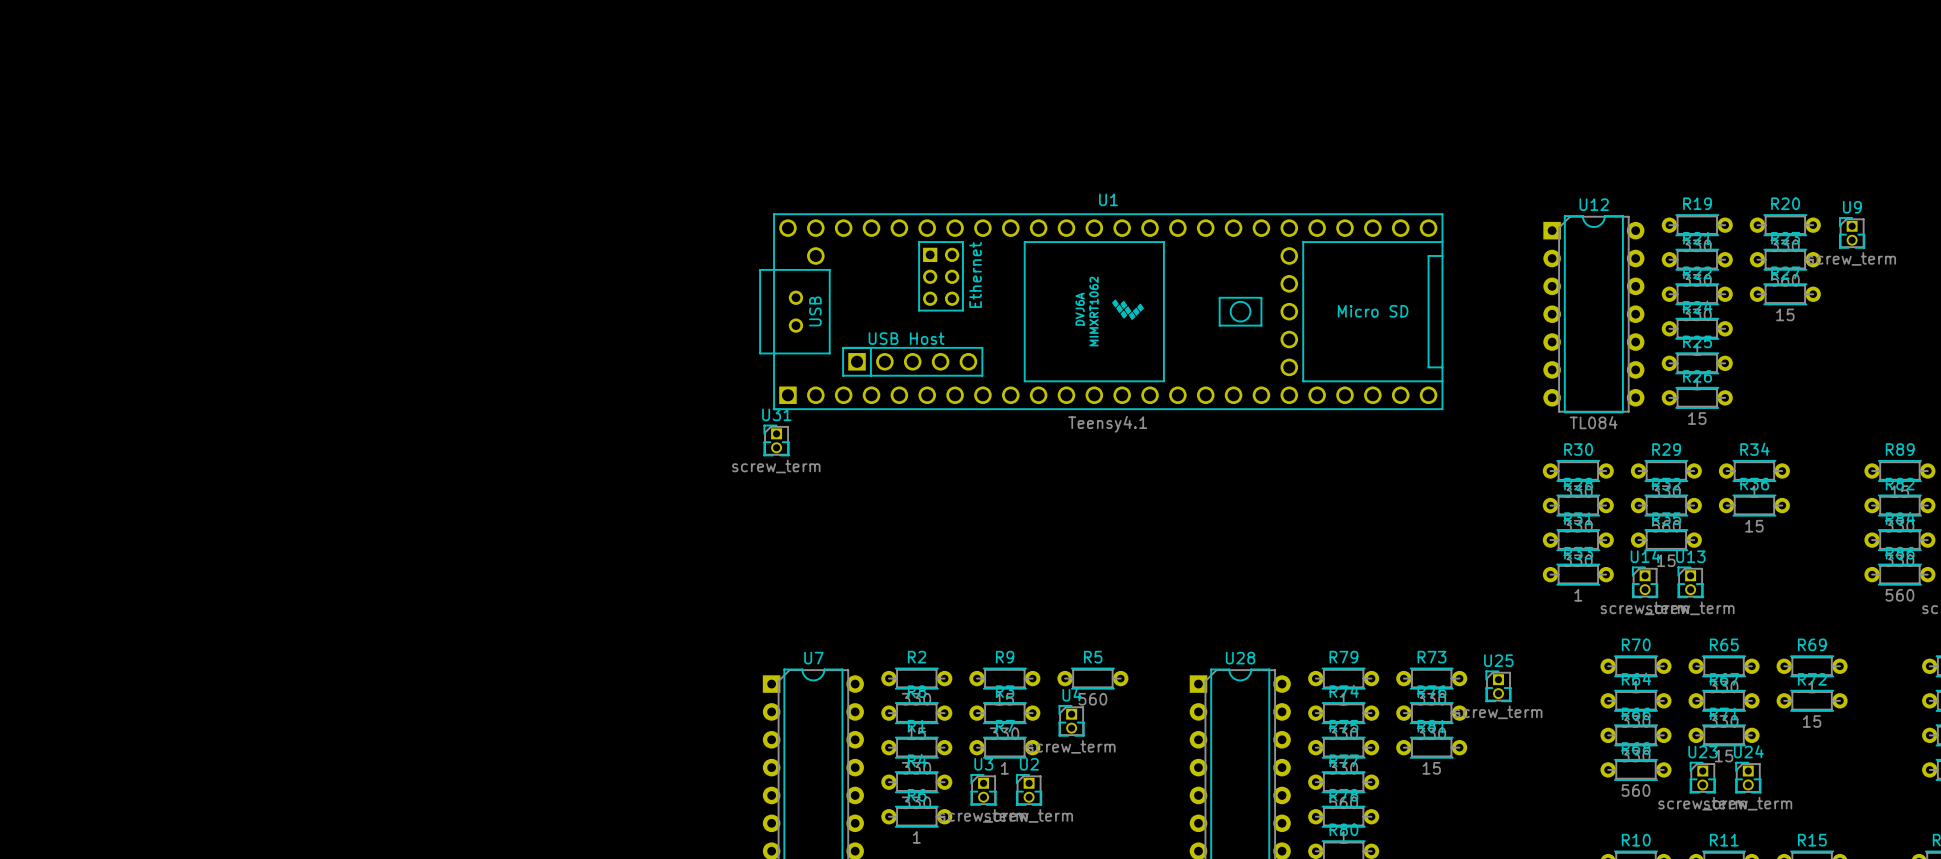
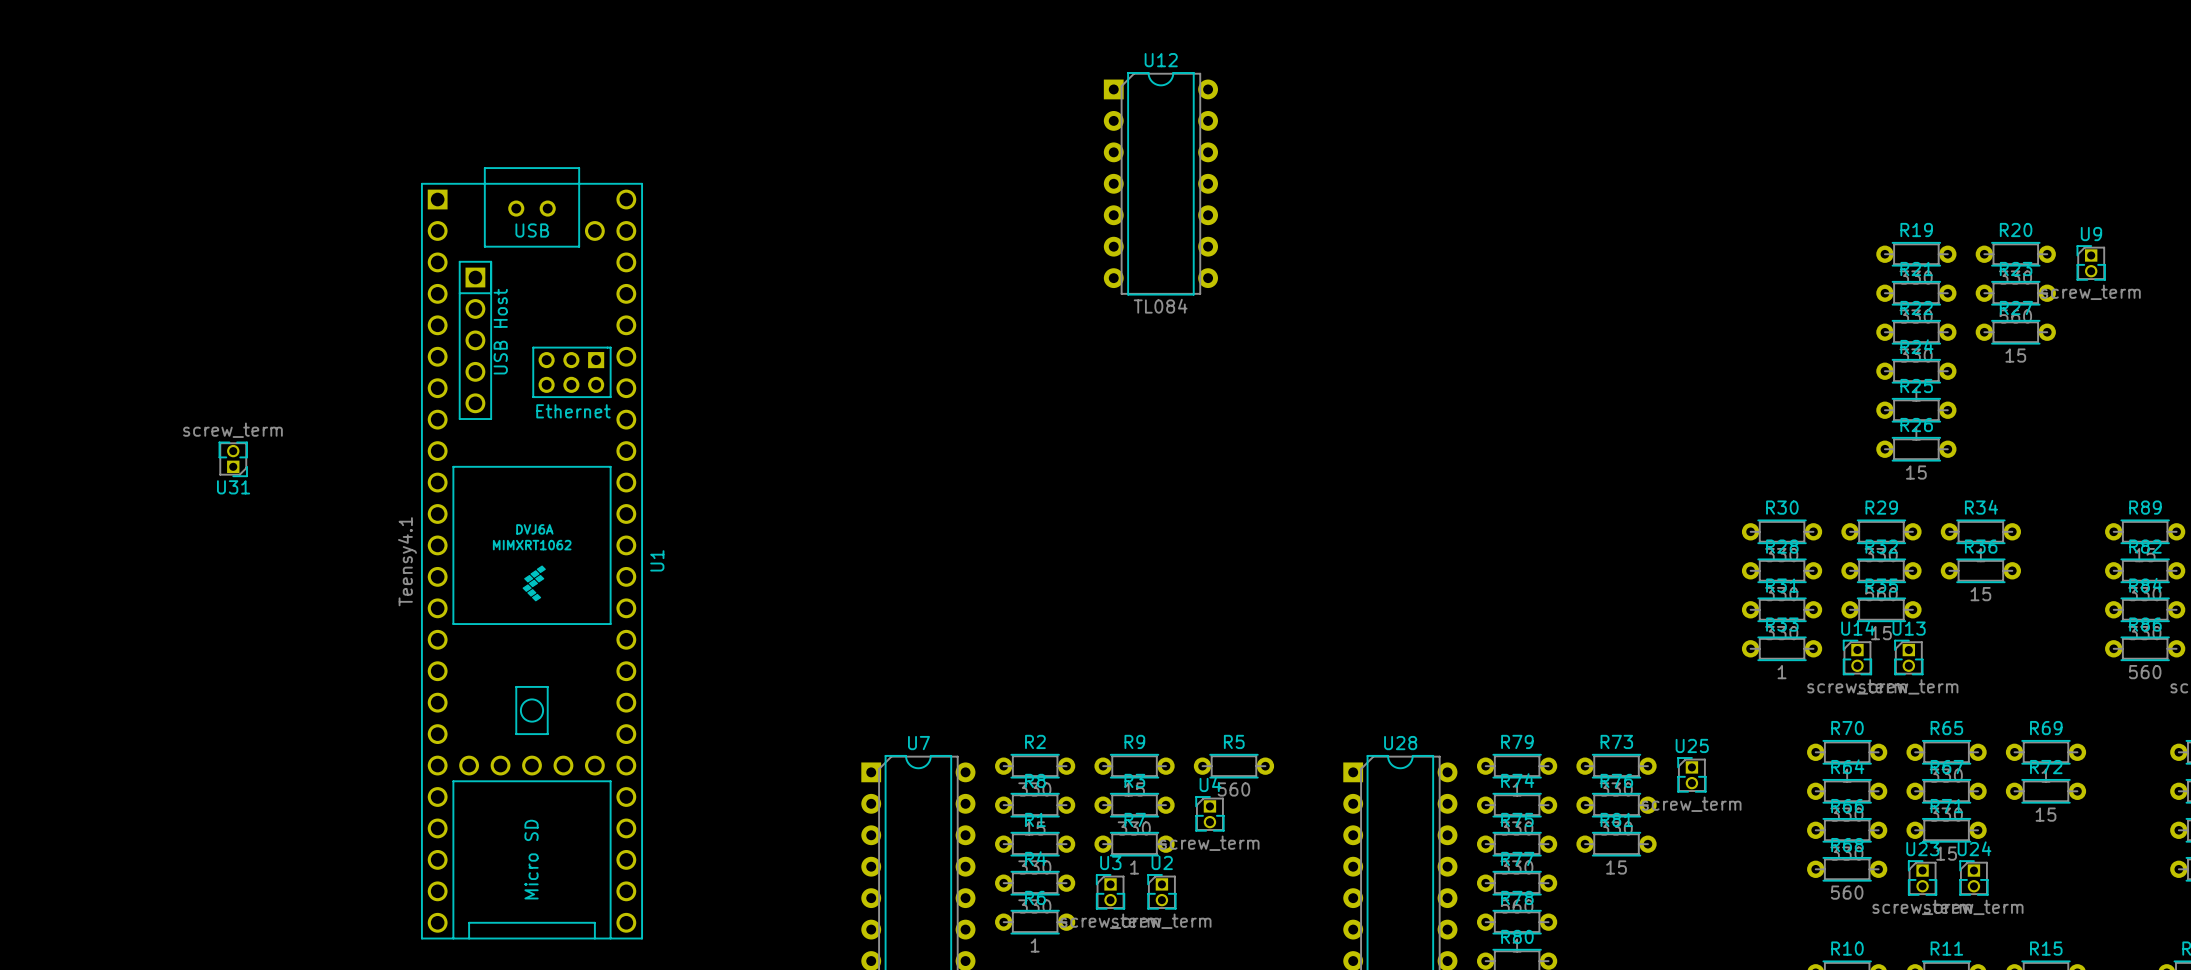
U1 rotation: 0° (1101, 311) -> 90° clockwise (531, 553)
U1 position: (1101, 311) -> (531, 553)
U12 position: (1593, 314) -> (1160, 183)
U31 rotation: 0° (776, 440) -> 180° (233, 459)
U31 position: (776, 440) -> (233, 459)

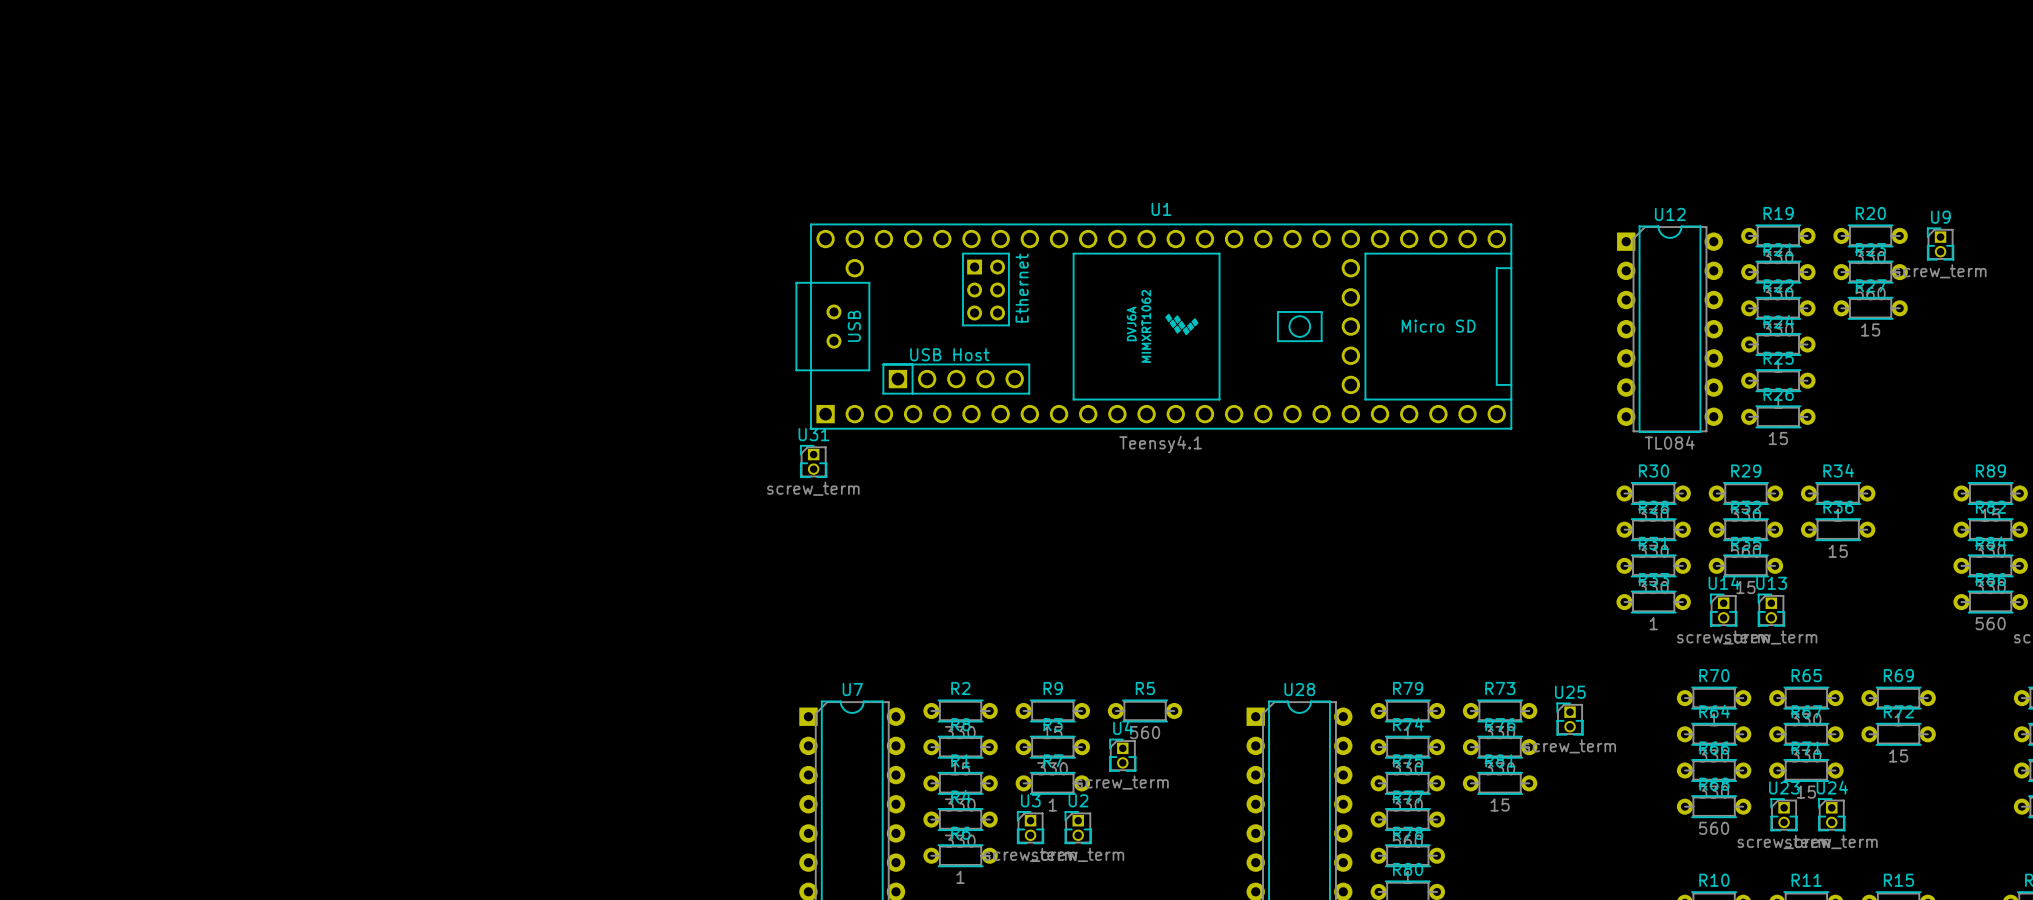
U12 position: (1160, 183) -> (1670, 329)
U31 rotation: 0° (233, 459) -> 180° (813, 461)
U31 position: (233, 459) -> (813, 461)
U1 rotation: 0° (531, 553) -> 90° counterclockwise (1153, 326)
U1 position: (531, 553) -> (1153, 326)

